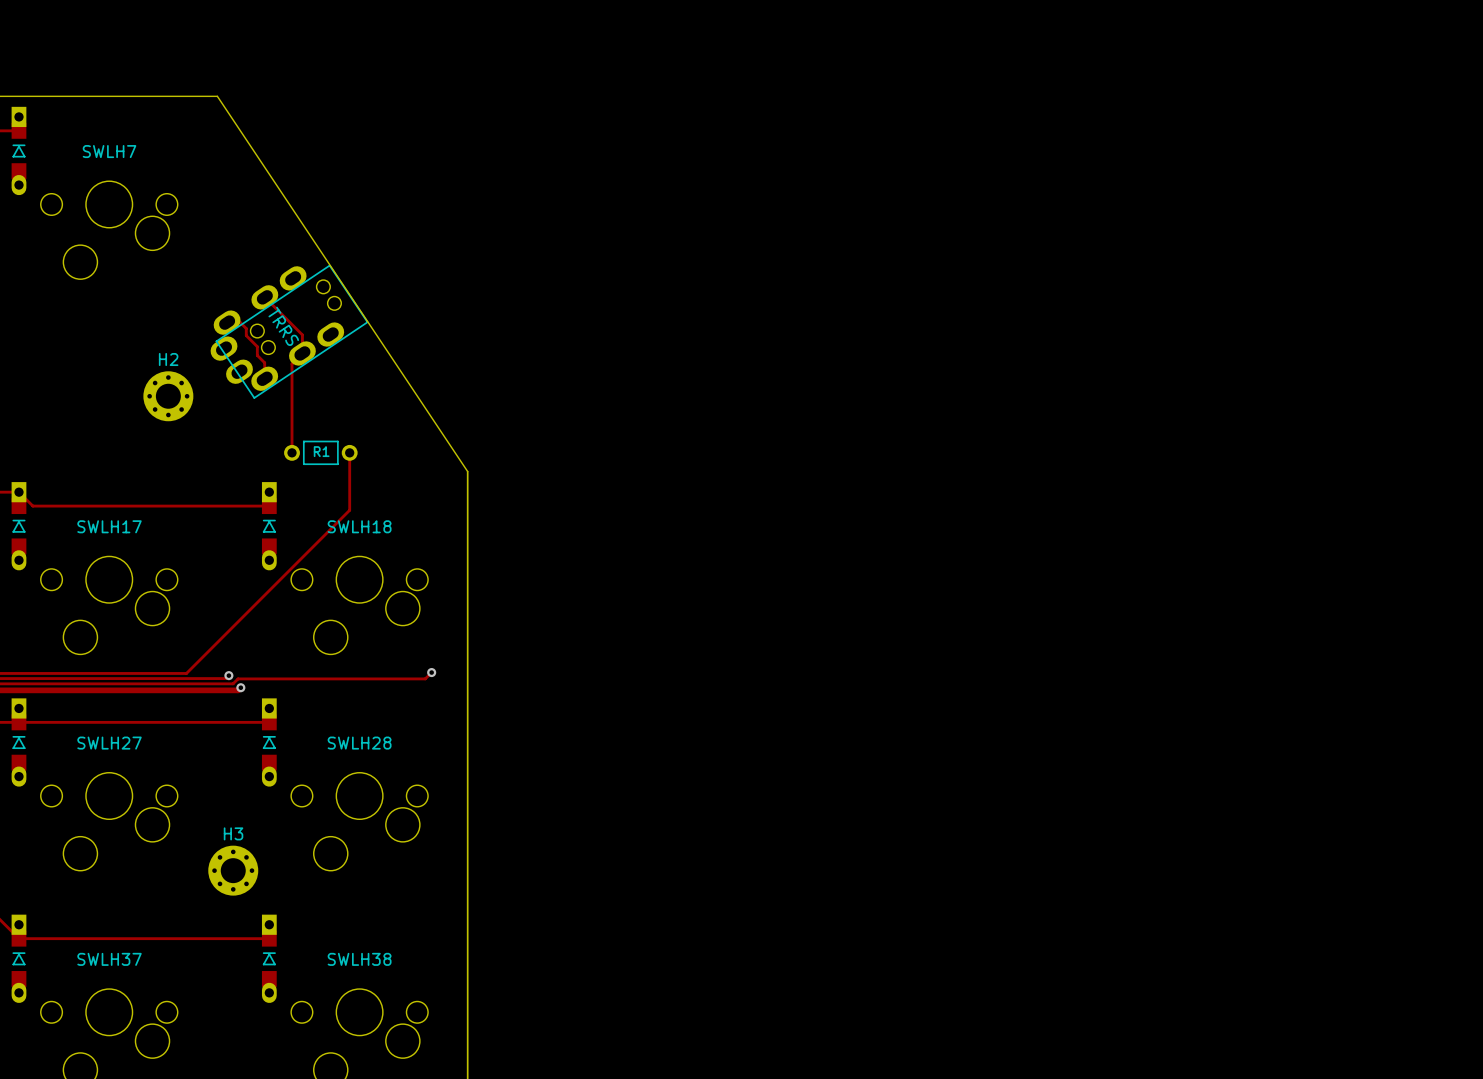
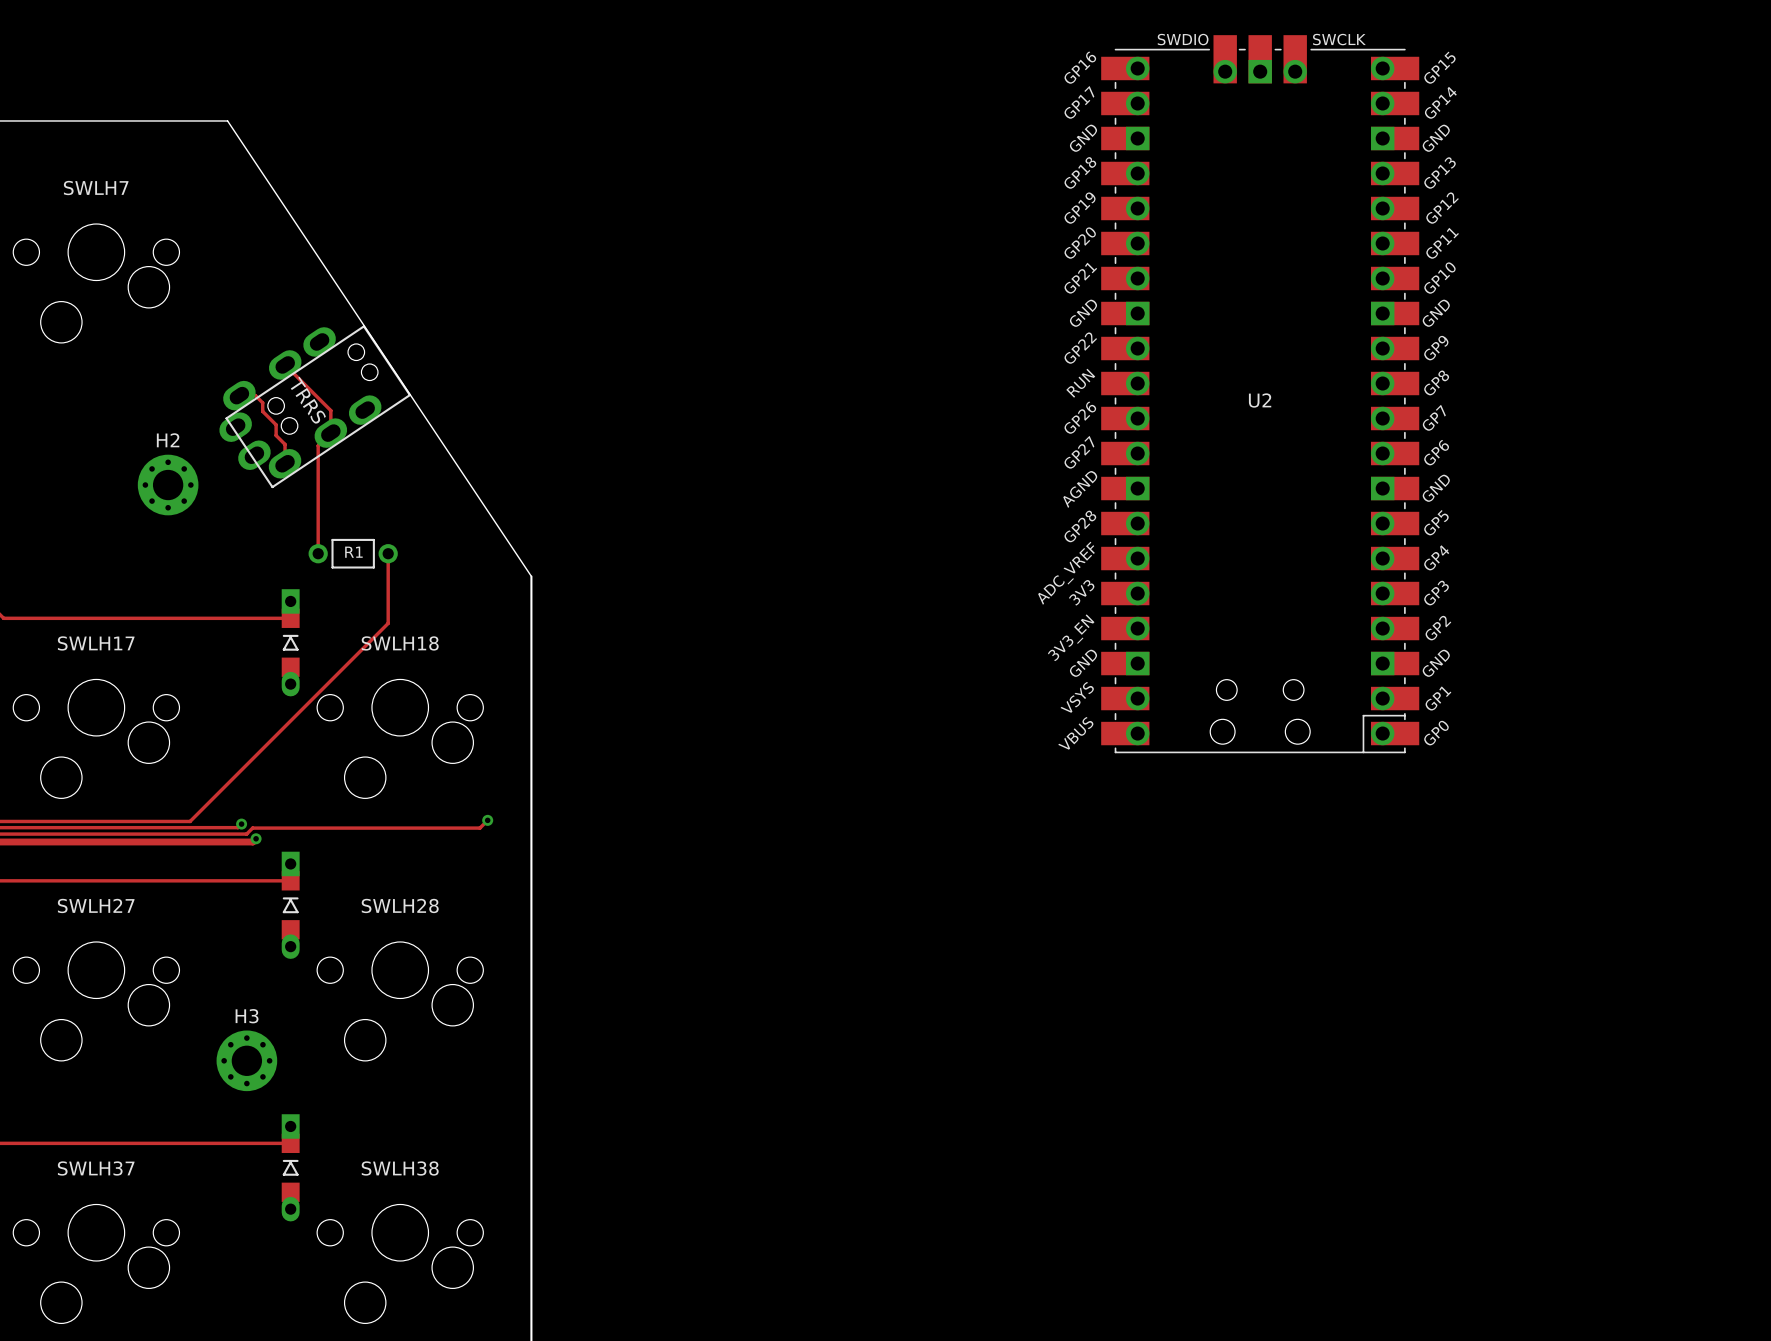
U2: none -> (1260, 394)

